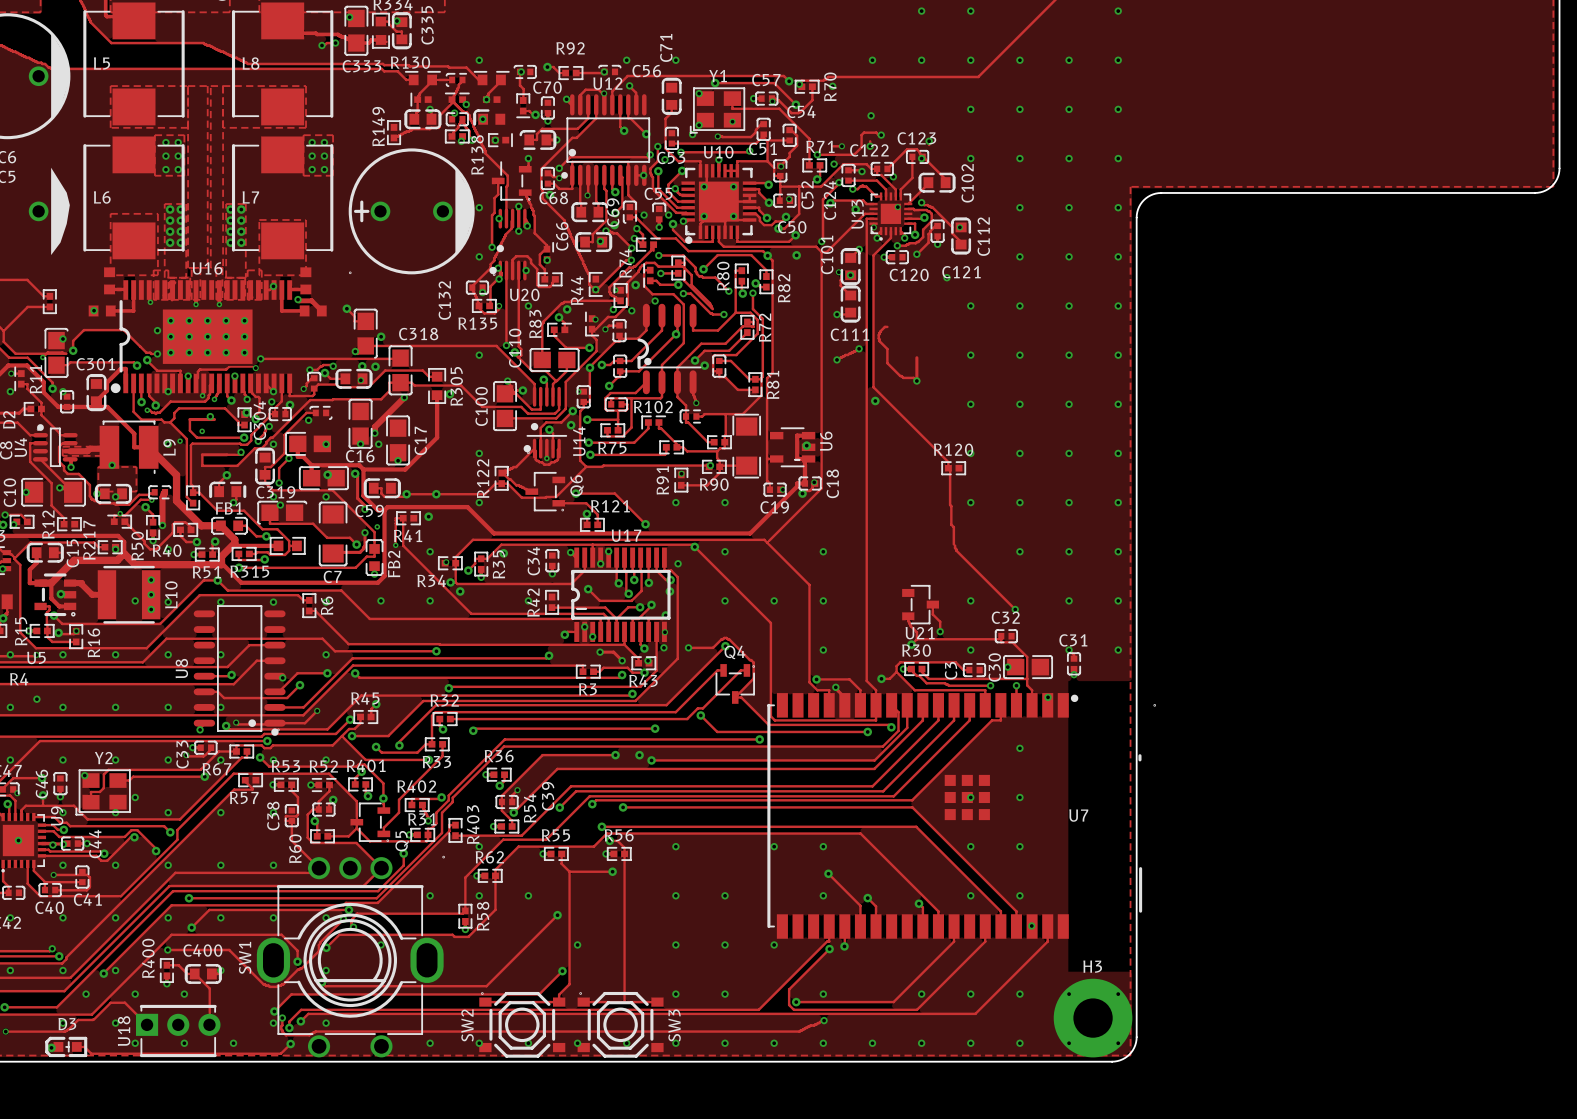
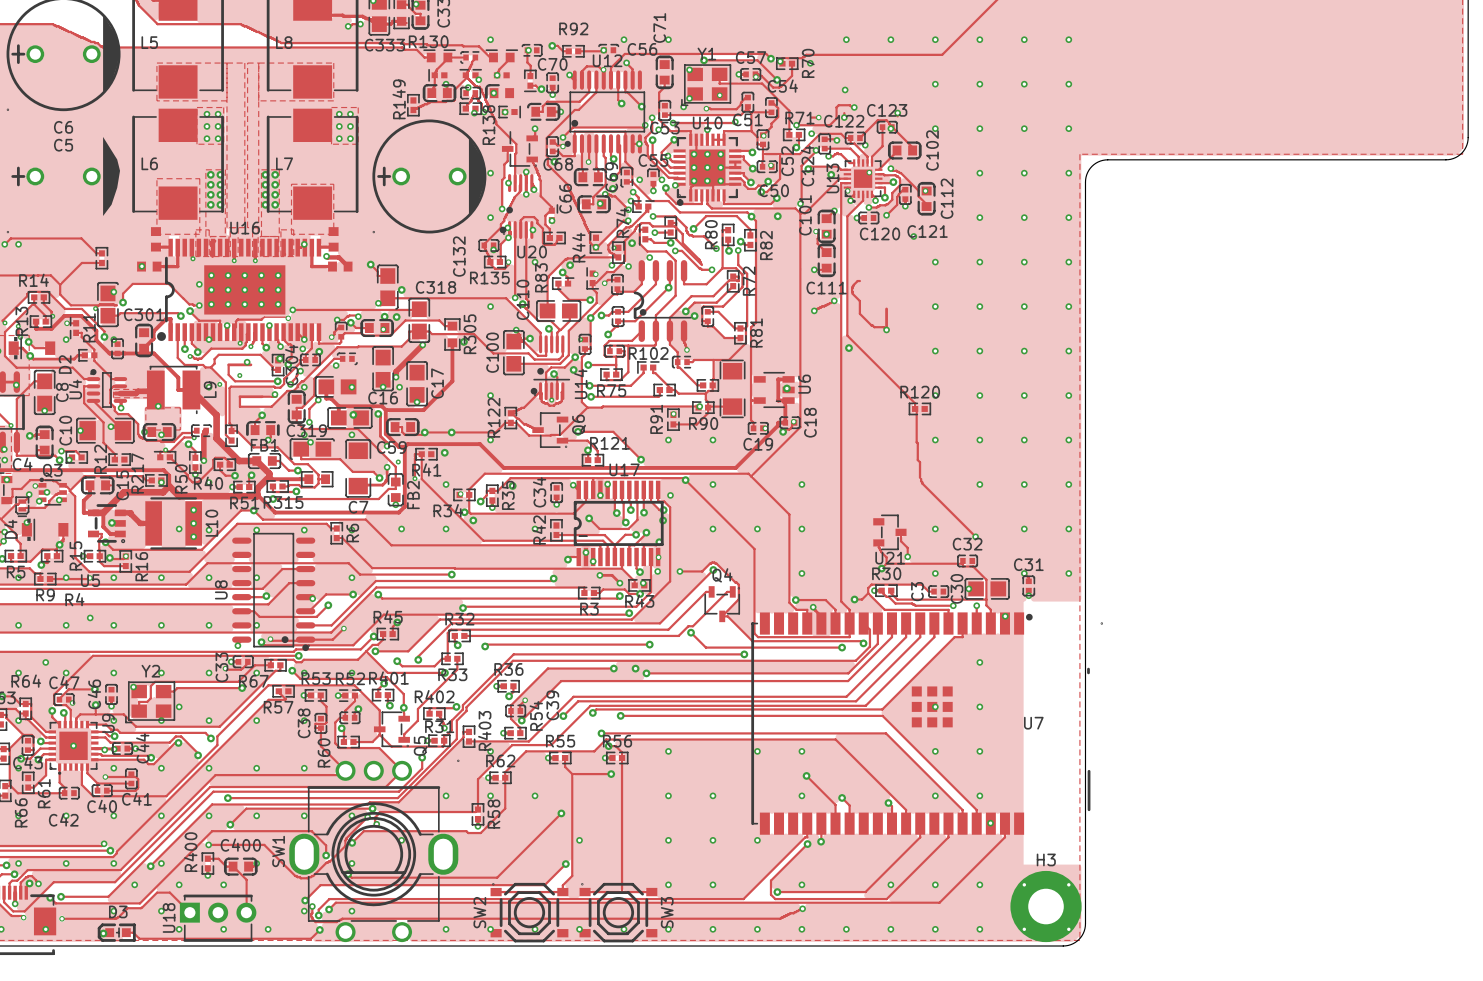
via: none -> (707, 154)
via: none -> (694, 167)
via: none -> (707, 167)
via: none -> (720, 167)
via: none -> (707, 180)

